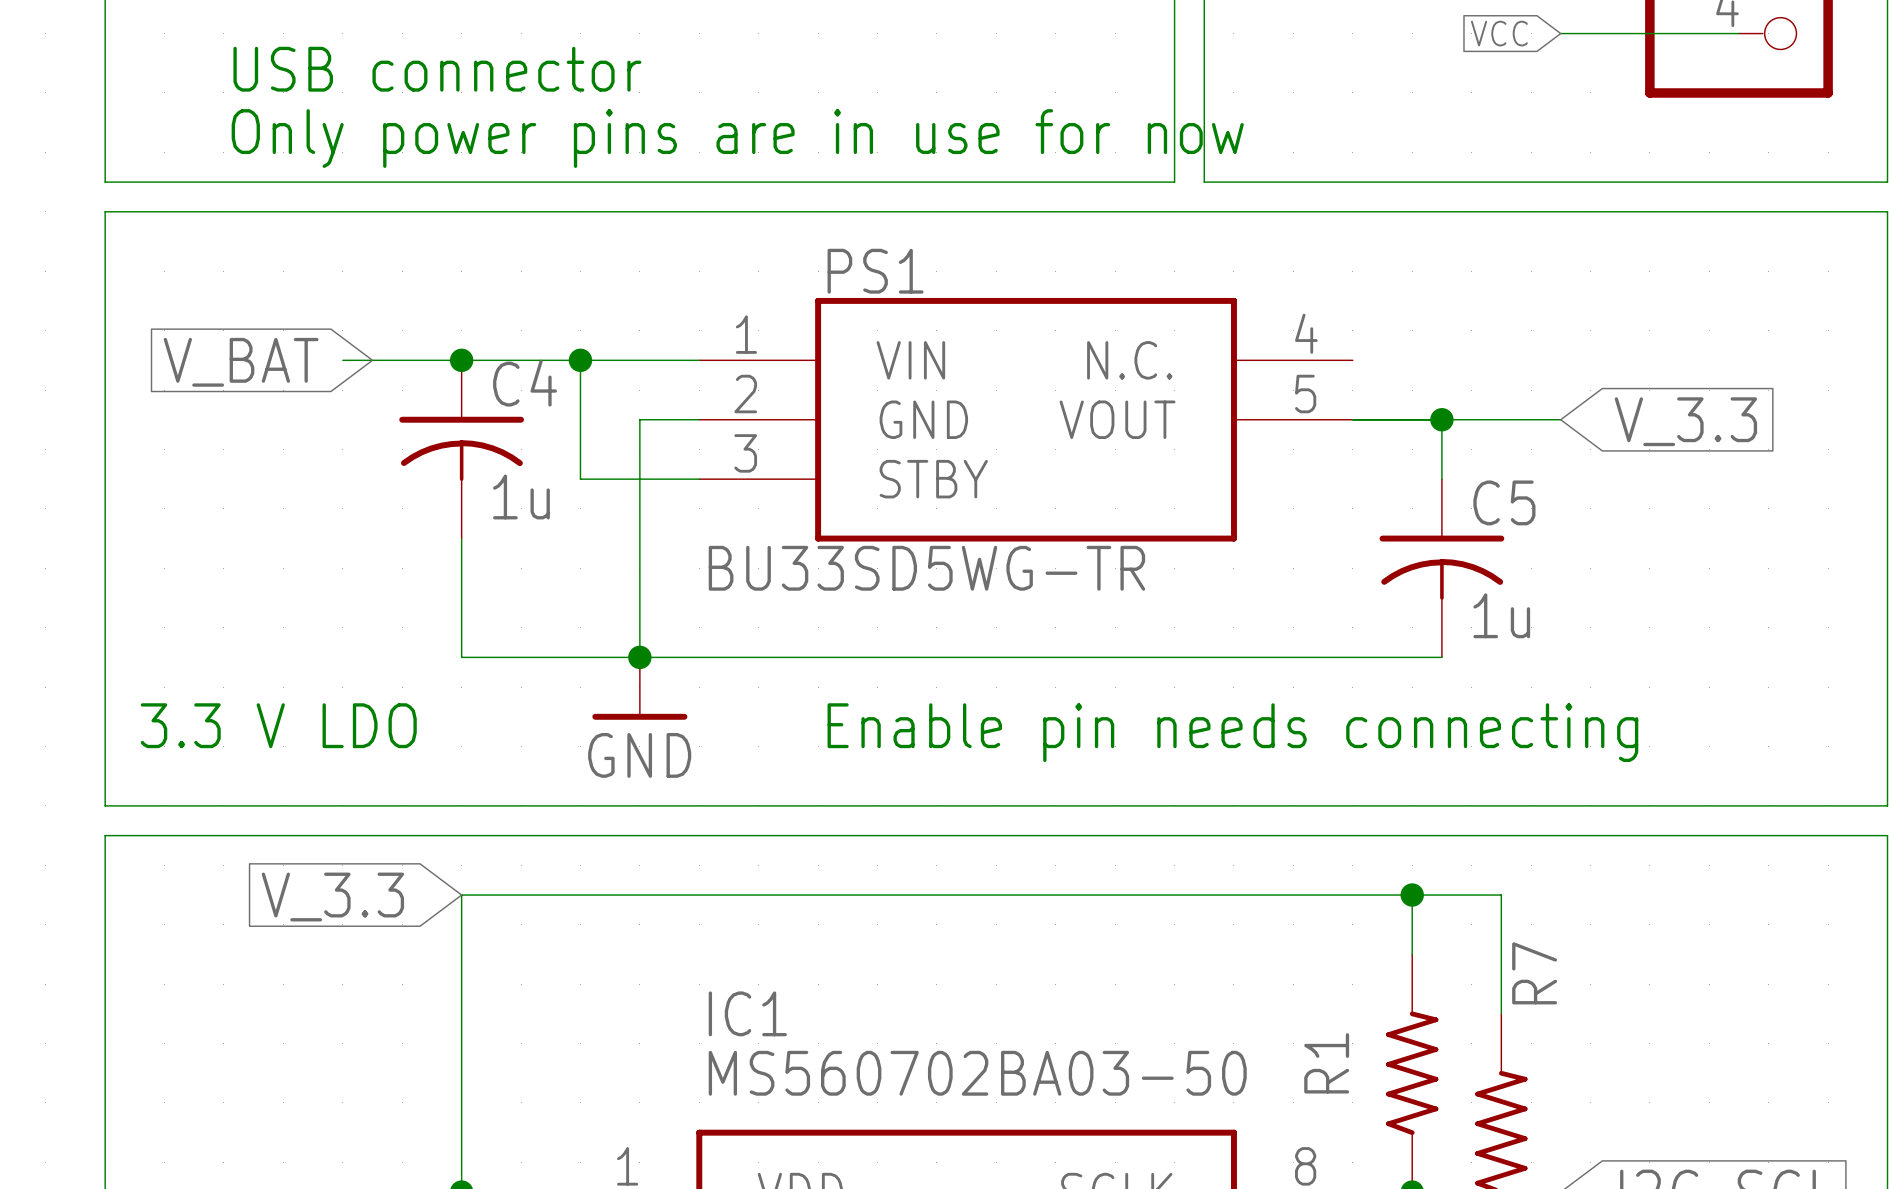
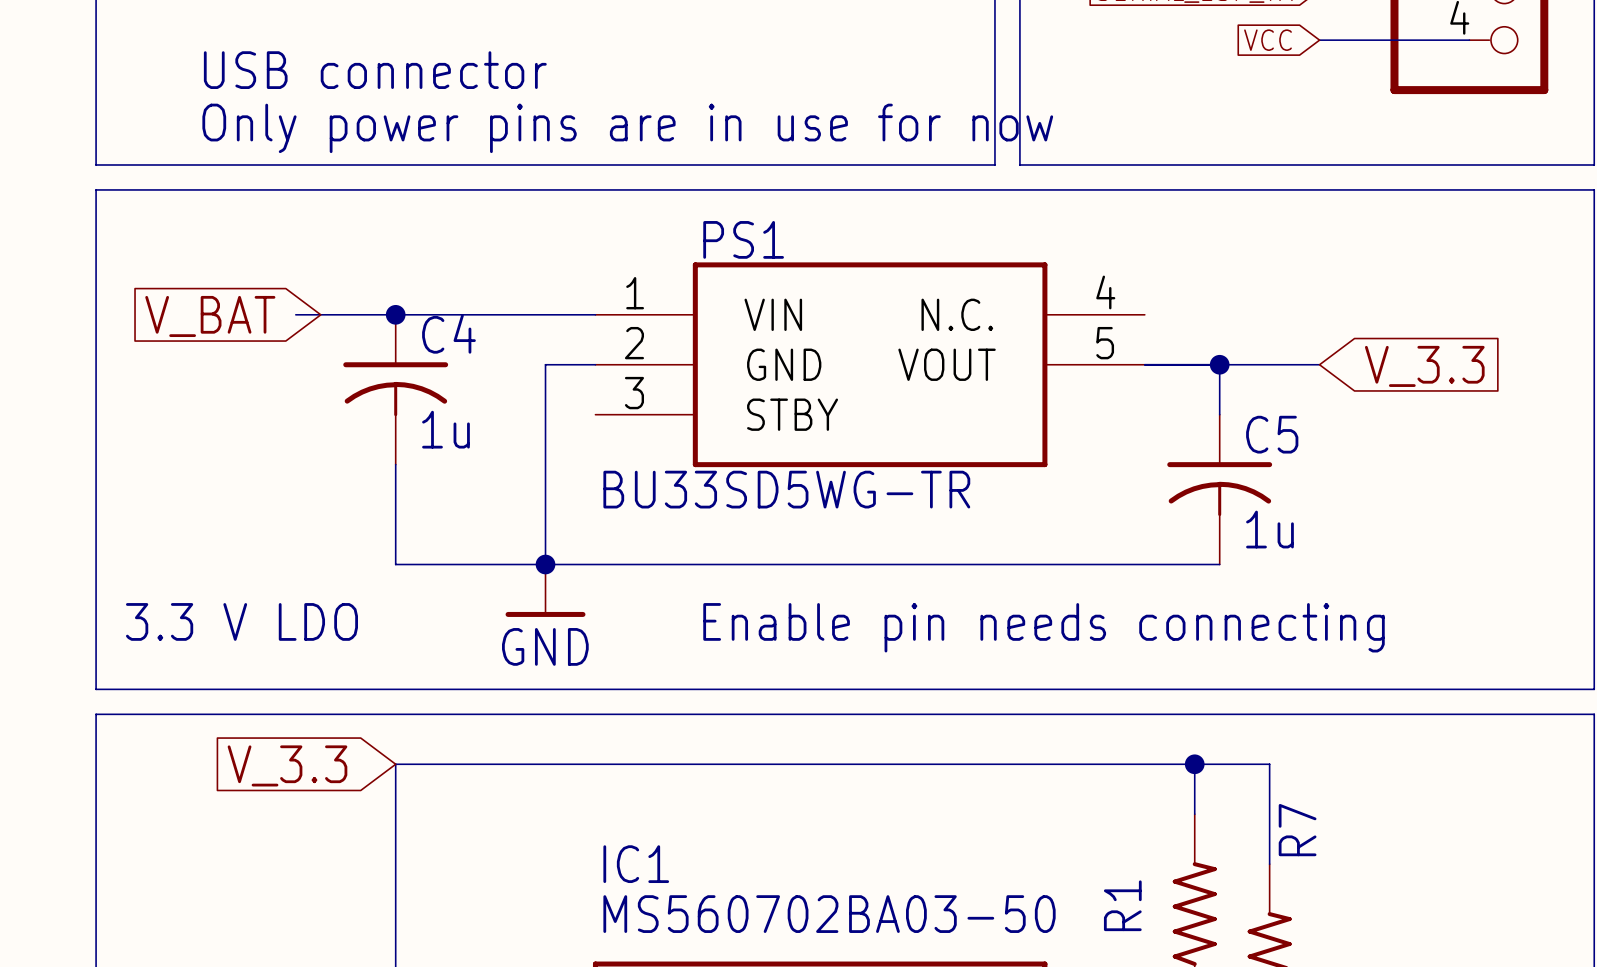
wire: (580, 360) (580, 479) (699, 479) -> none
junction: (580, 360) -> none

